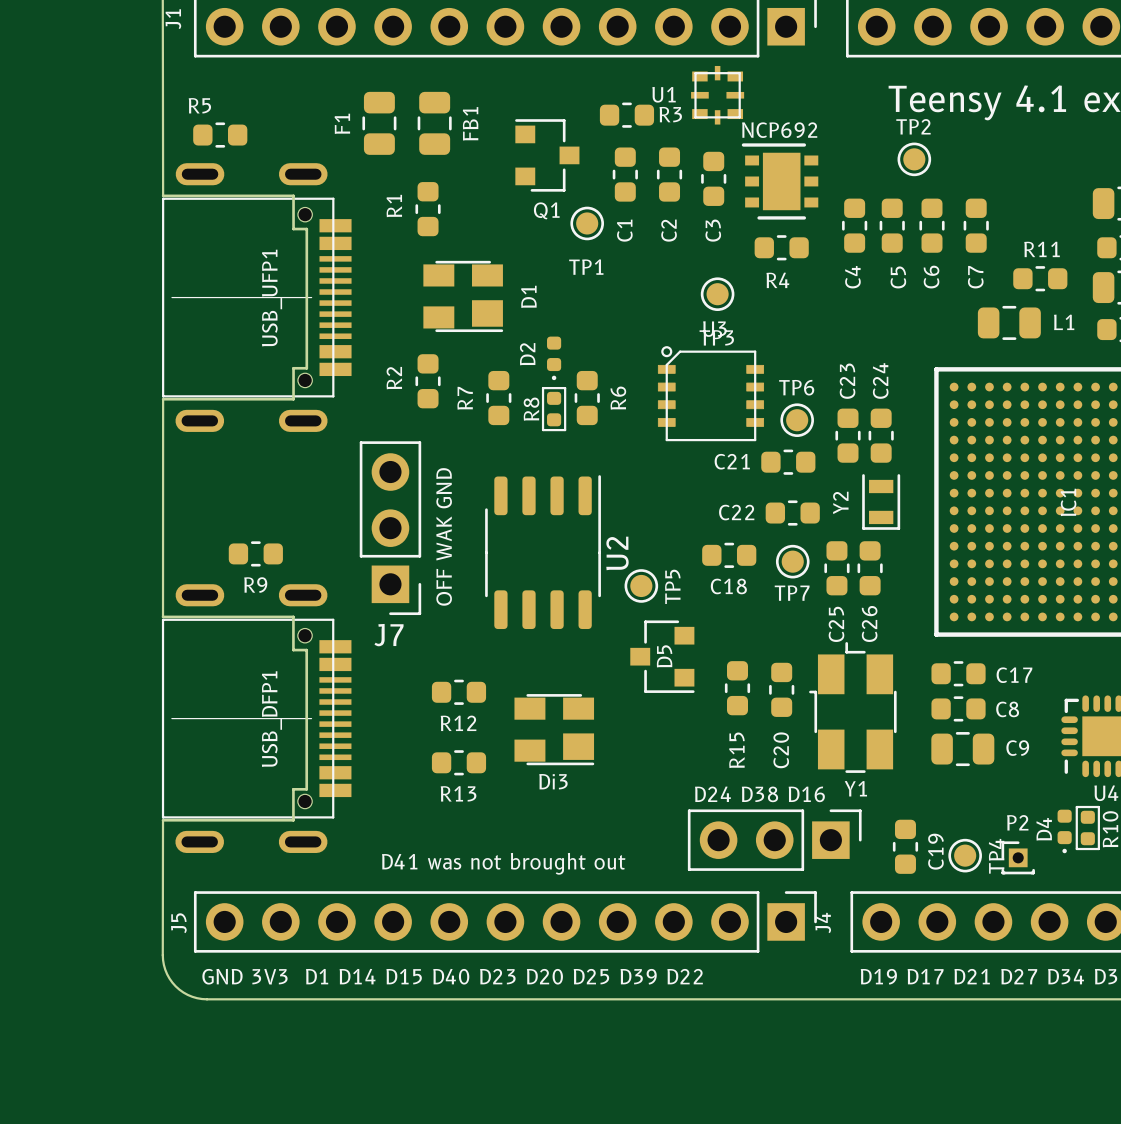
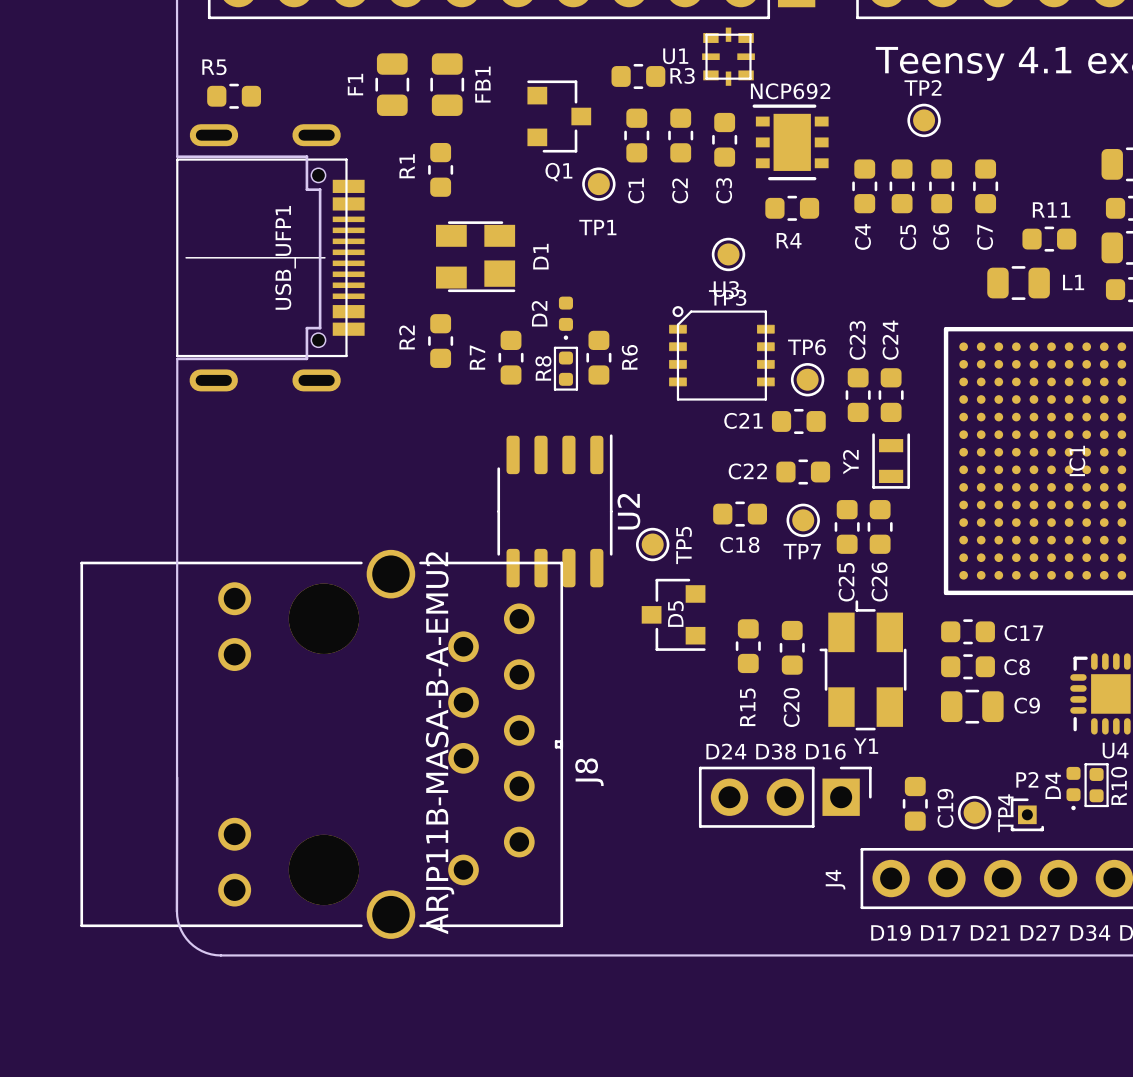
board edge: (163, 399) (163, 616) -> (177, 358) (176, 911)
J7: (390, 528) -> none
text: OFF WAK GND (444, 536) -> none
R9: (255, 553) -> none
R12: (458, 692) -> none
USB_DFP1: (256, 718) -> none
Di3: (554, 729) -> none
R13: (458, 762) -> none
J8: none -> ARJP11B-MASA-B-A-EMU2 (321, 744)
text: D41 was not brought out (503, 863) -> none
J5: (505, 921) -> none
text: GND 3V3 D1 D14 D15 D40 D23 D20 D25 D39 D22 (452, 976) -> none

